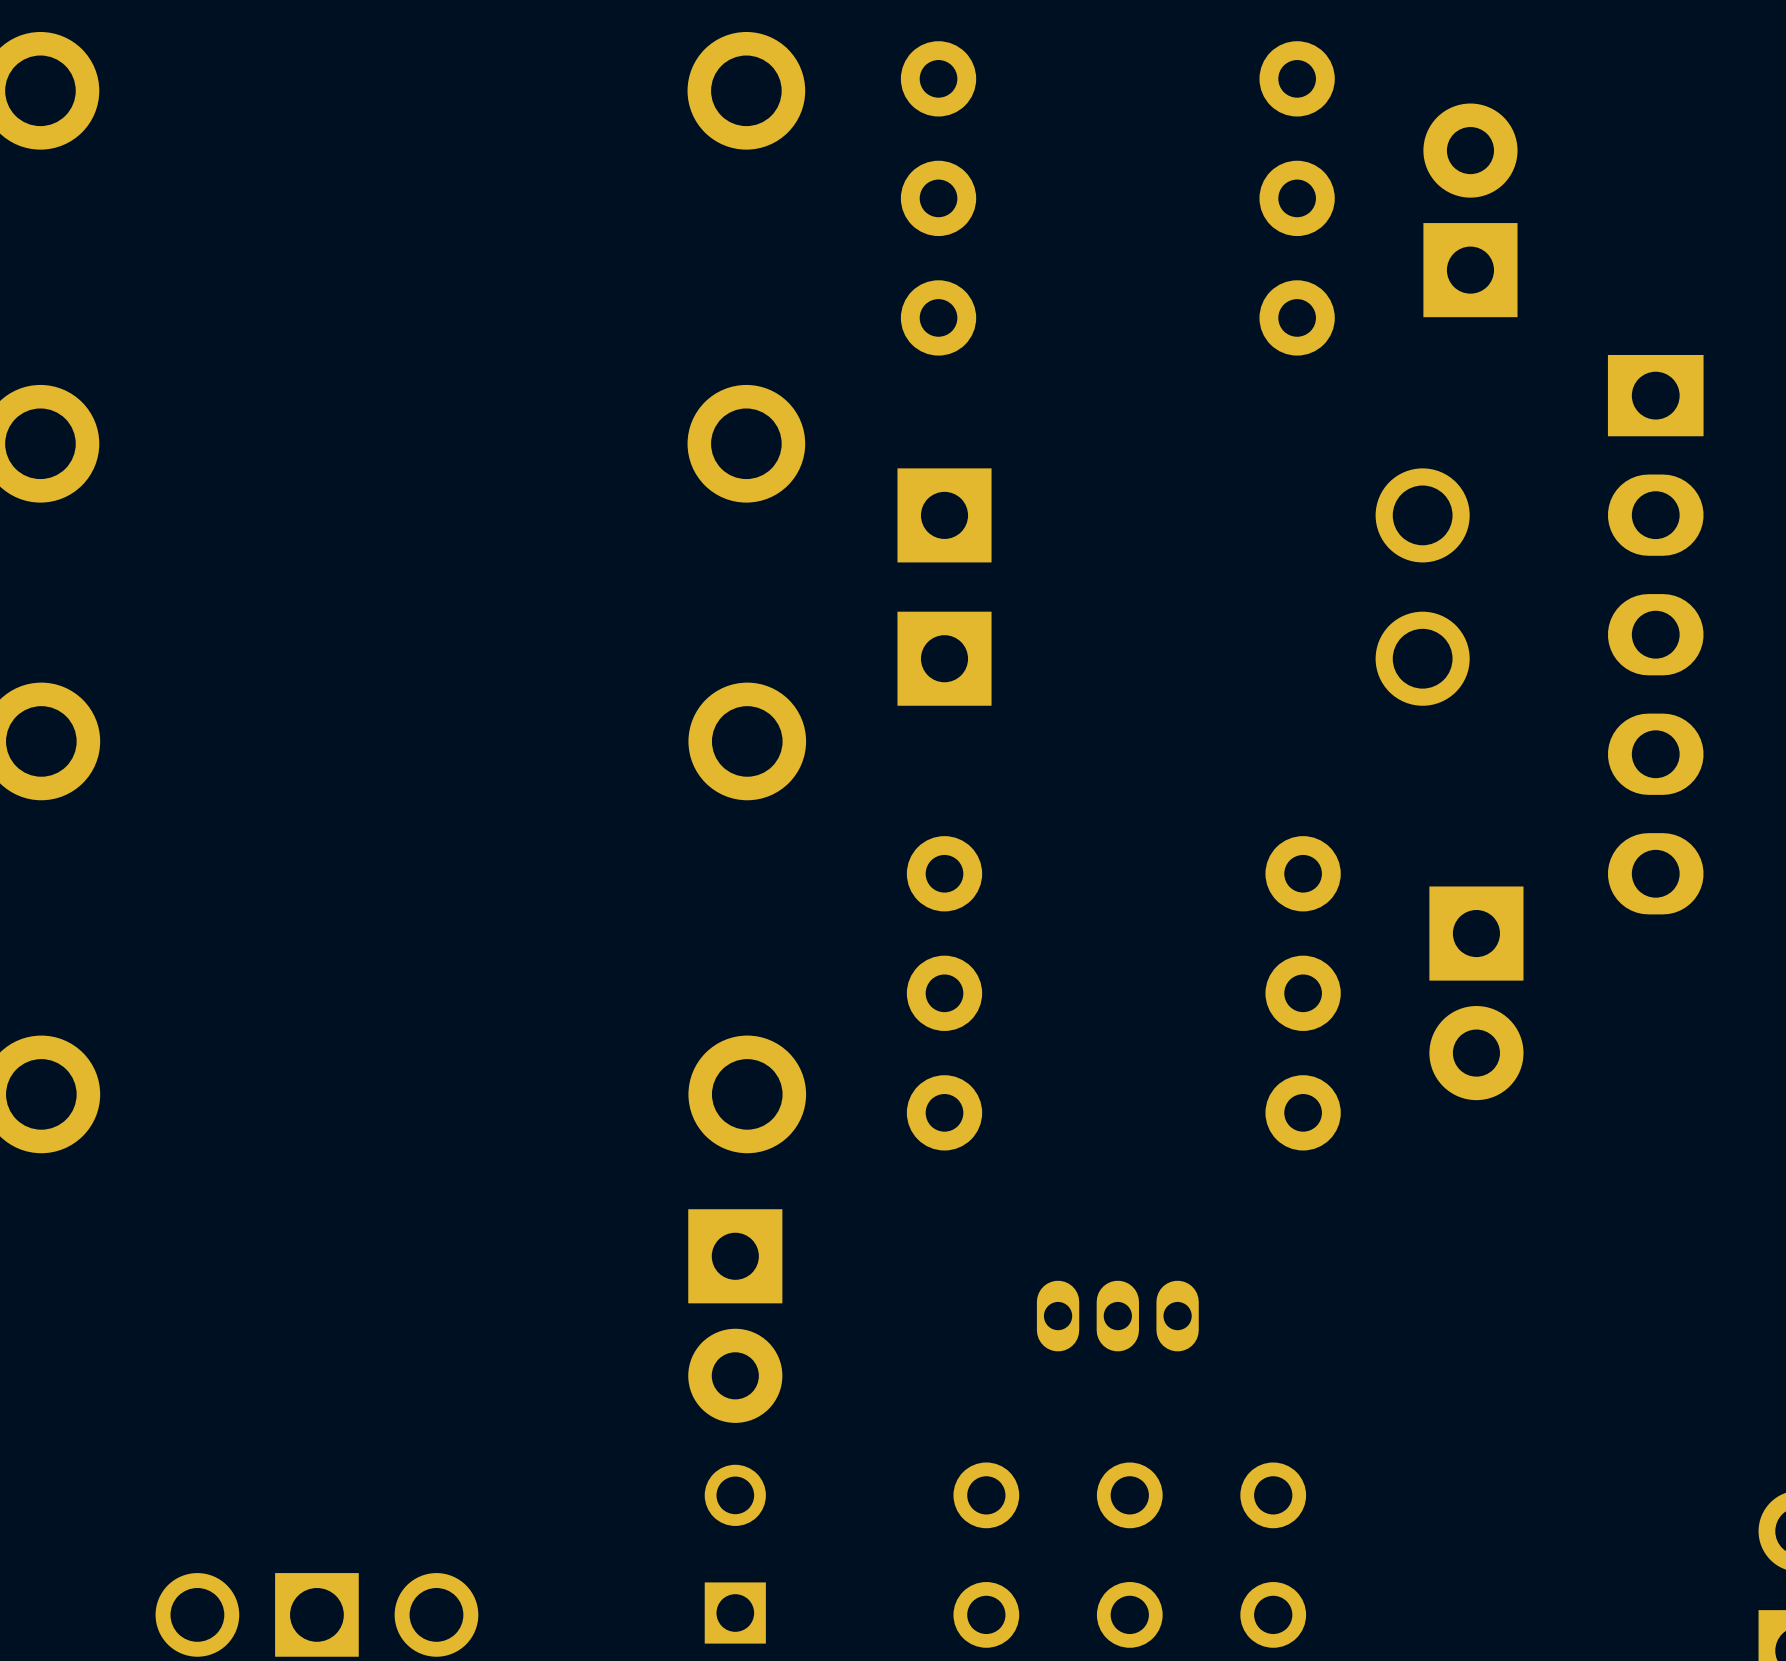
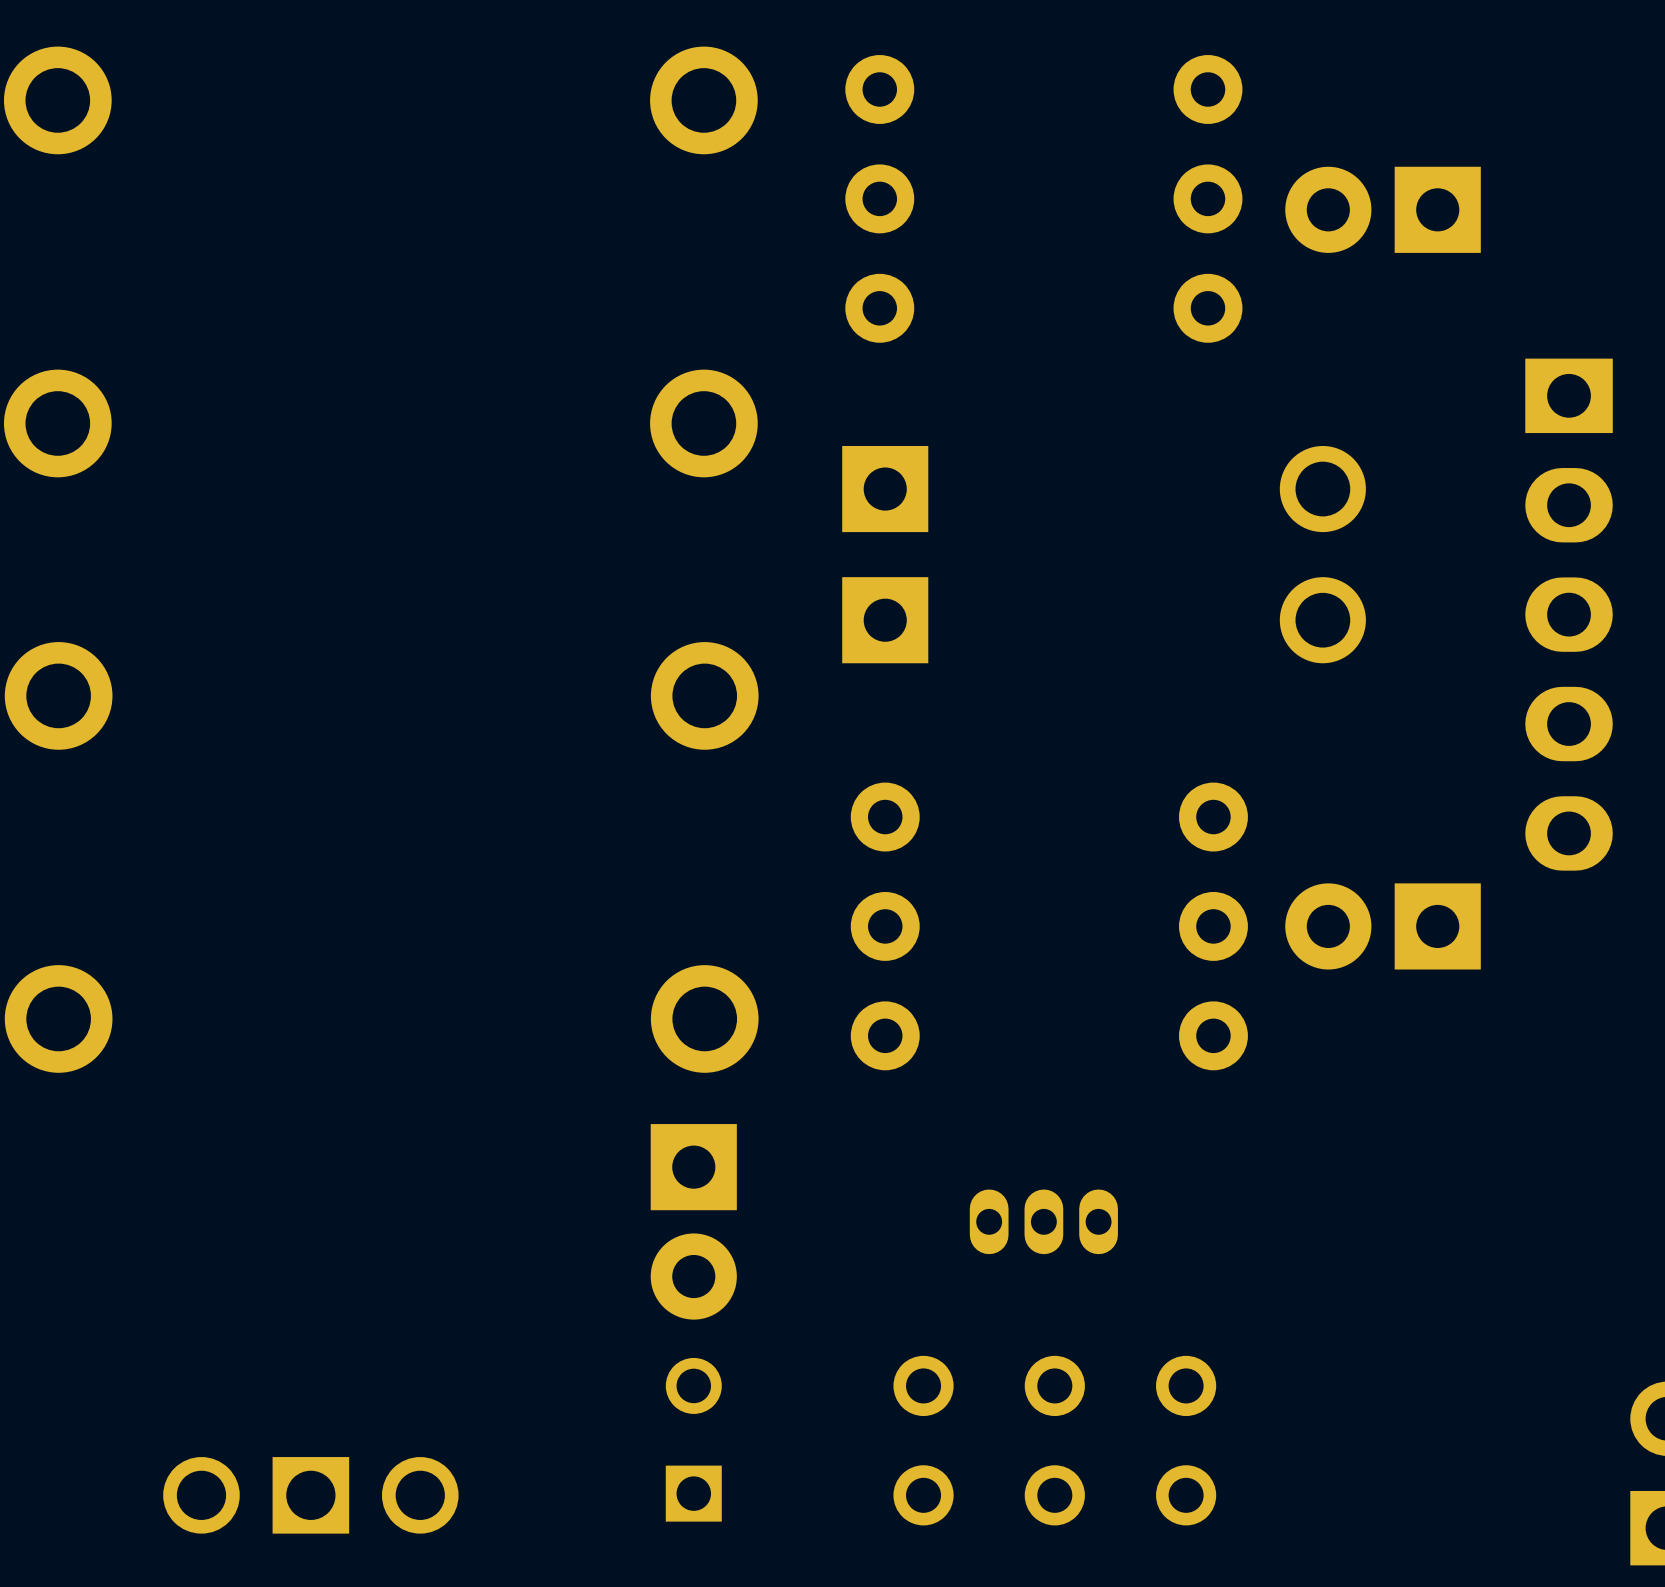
part rotation: 0° (1470, 210) -> 90° counterclockwise (1383, 209)
part position: (1655, 634) -> (1569, 614)
part rotation: 0° (1476, 993) -> 90° clockwise (1383, 926)

